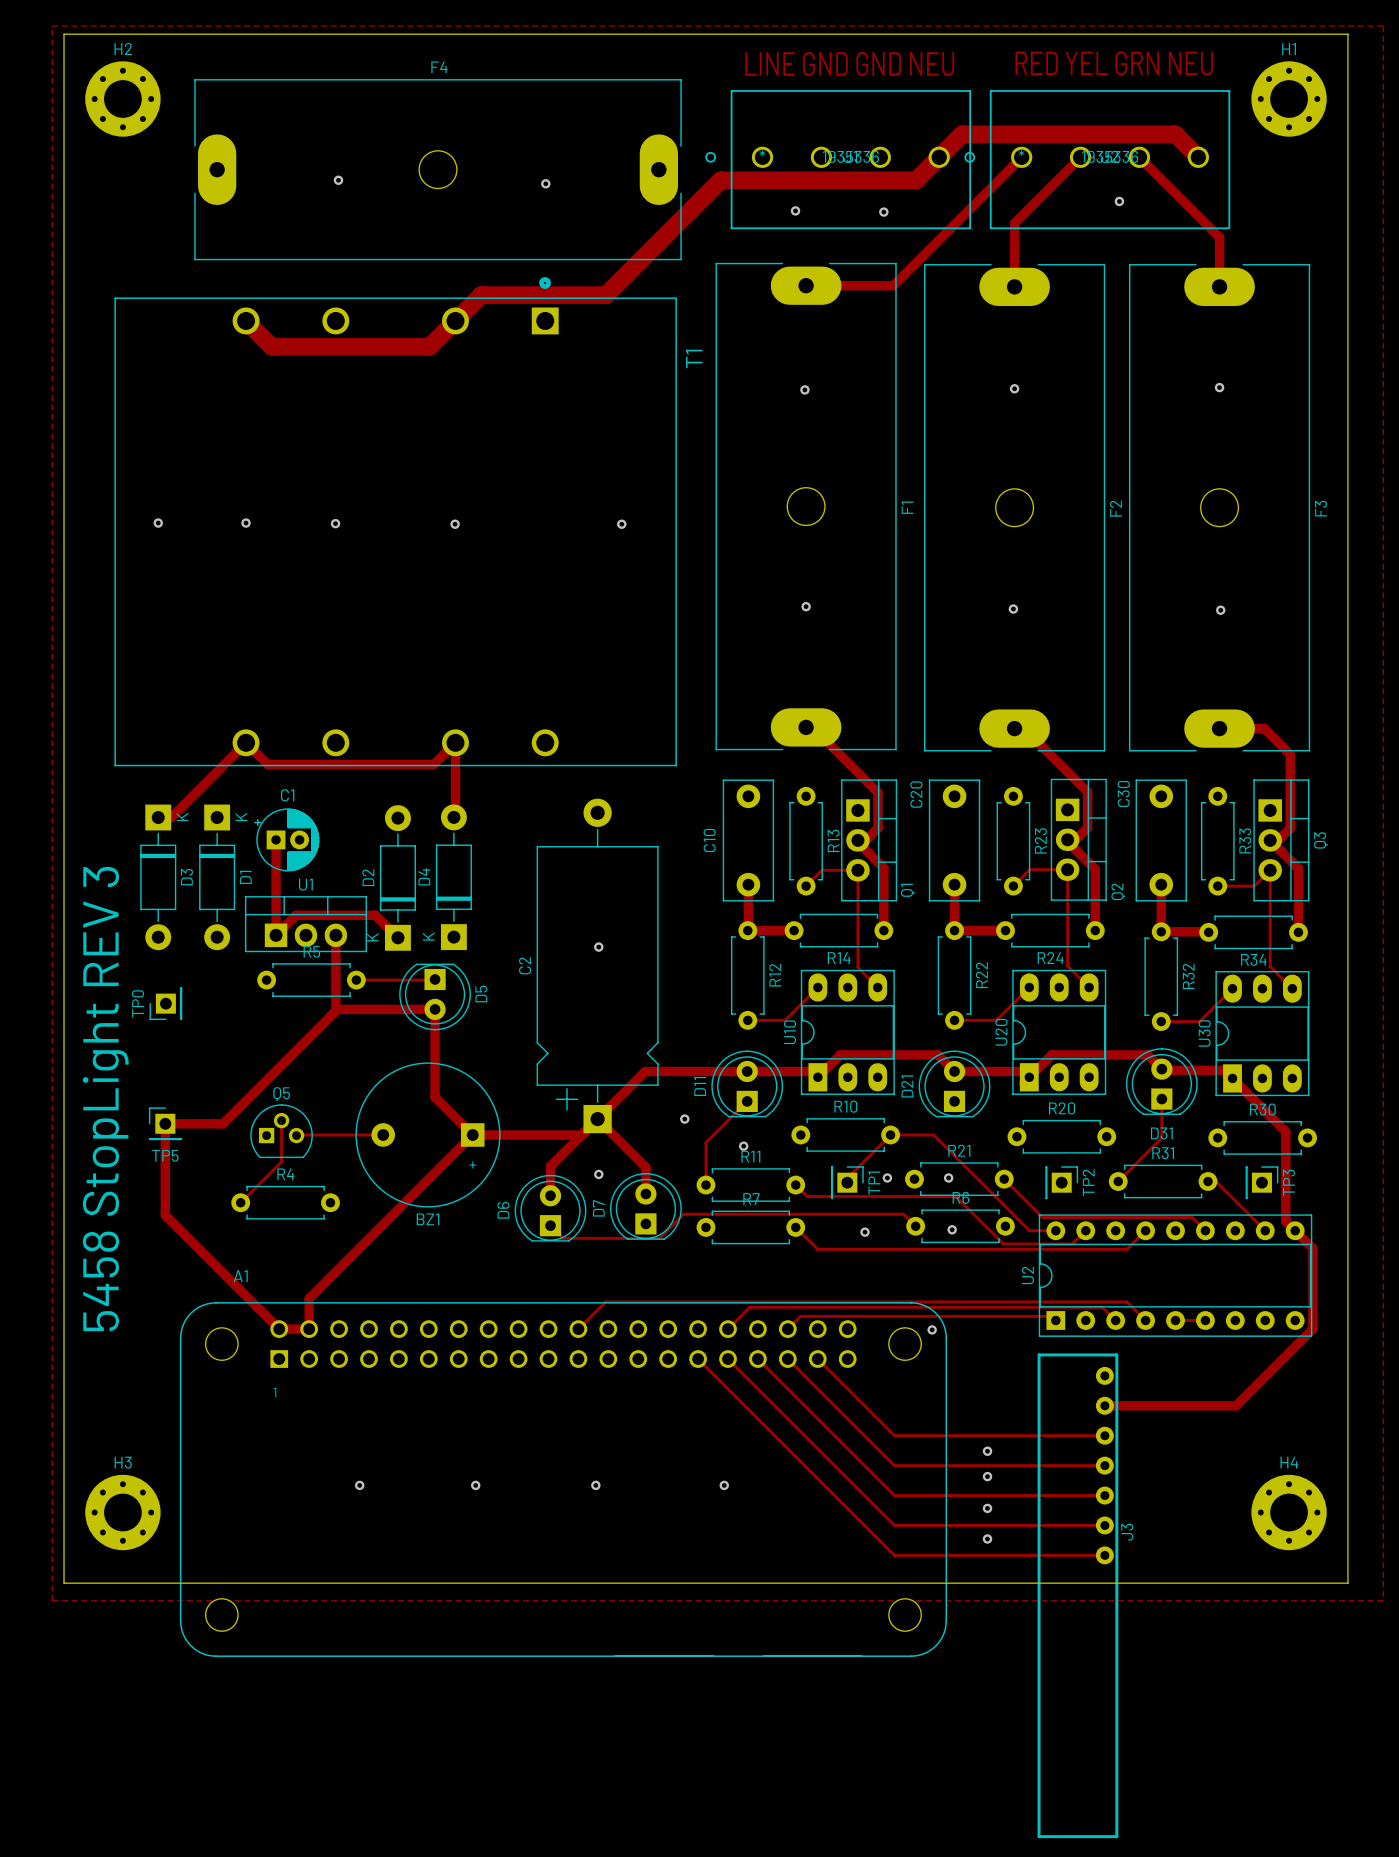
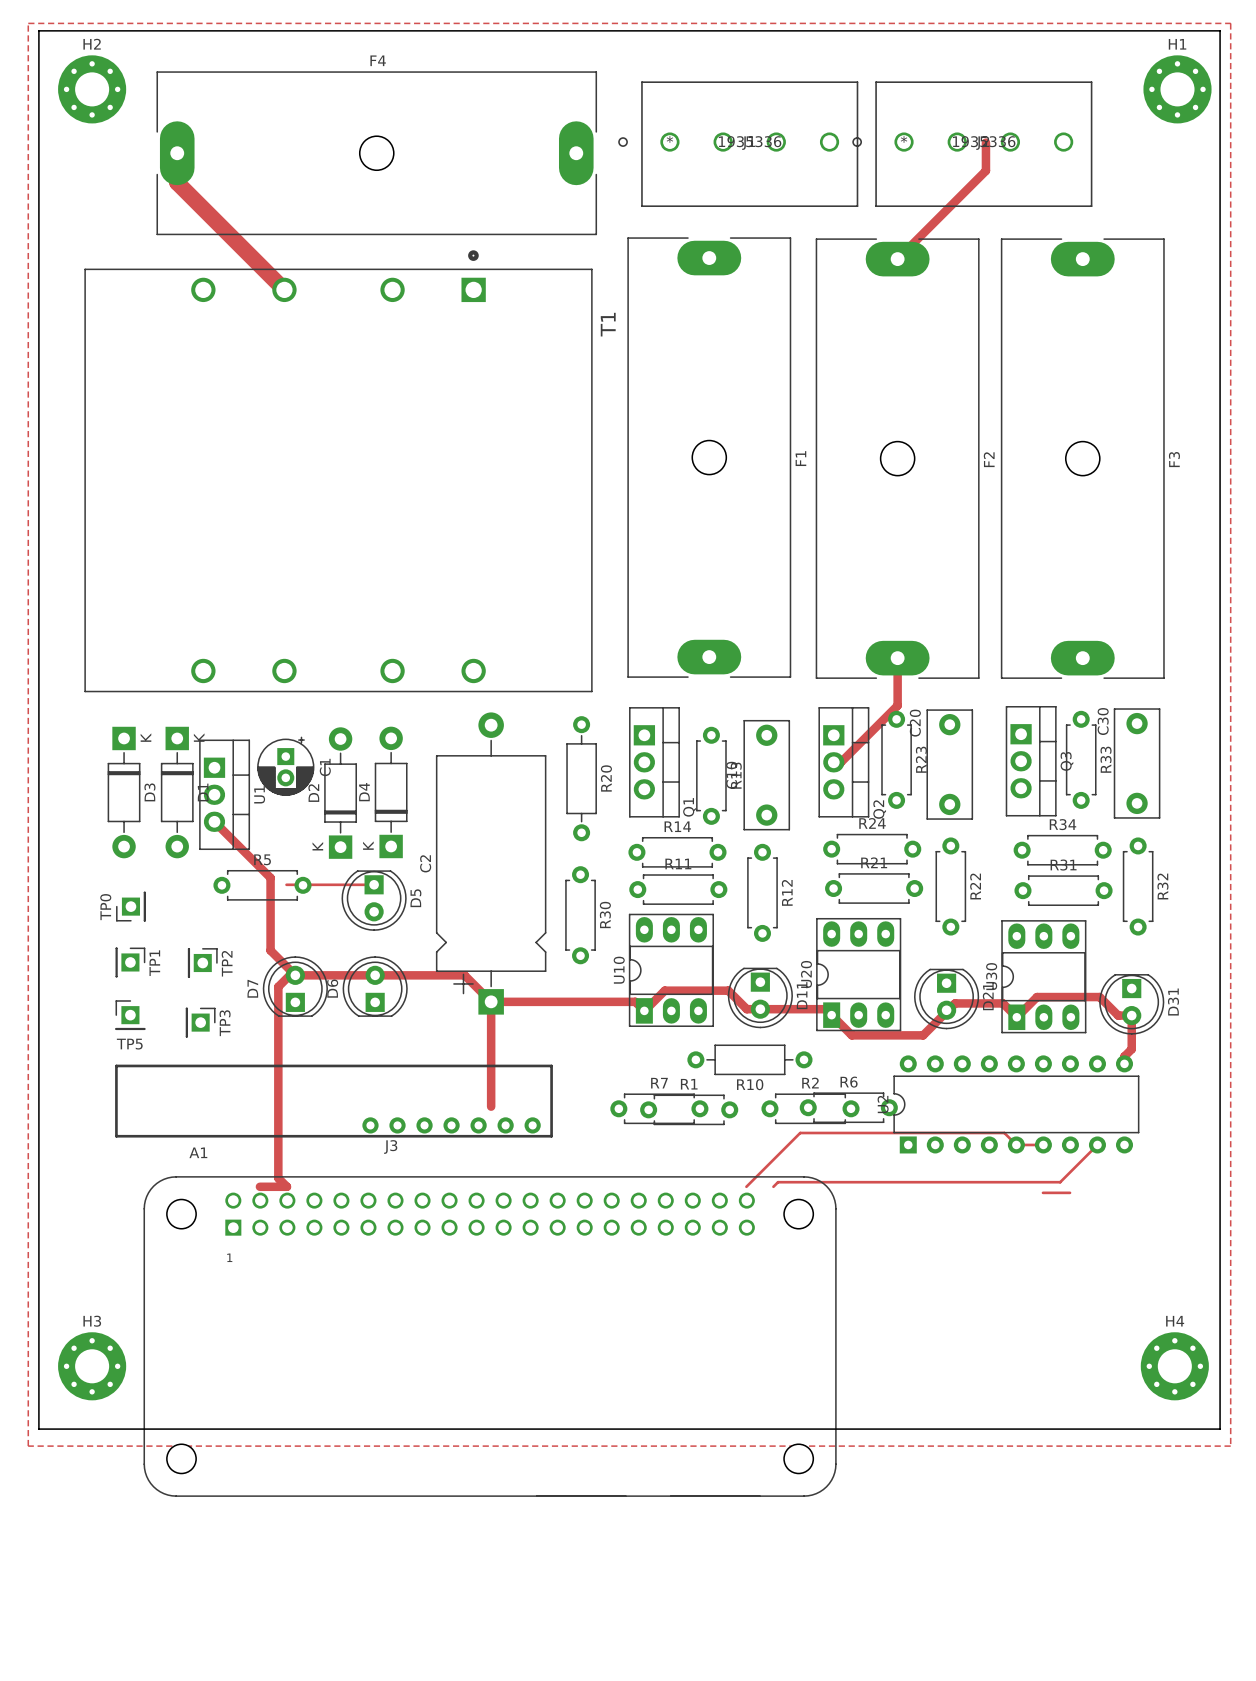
board edge: (1347, 34) (1347, 1583) (64, 1582) -> (1198, 30) (1220, 30) (1220, 1429) (38, 1429)
text: LINE GND GND NEU (849, 63) -> none
text: RED YEL GRN NEU (1114, 63) -> none
H1 position: (1289, 98) -> (1177, 89)
track: (1021, 157) (893, 285) (806, 285) -> none
track: (1080, 157) (1014, 223) (1014, 286) -> (985, 142) (985, 170) (897, 259)
track: (1139, 157) (1219, 237) (1219, 286) -> none
track: (1198, 157) (1175, 134) (962, 134) (916, 180) (720, 180) (605, 295) (481, 295) (429, 346) (271, 346) (246, 320) -> none
via: (338, 180) -> none
track: none -> (177, 163) (177, 182) (284, 289)
via: (545, 183) -> none
via: (1119, 201) -> none
via: (795, 210) -> none
via: (883, 212) -> none
via: (1219, 387) -> none
via: (1014, 388) -> none
via: (804, 389) -> none
via: (158, 523) -> none
via: (246, 523) -> none
via: (335, 523) -> none
via: (455, 524) -> none
via: (621, 524) -> none
via: (806, 606) -> none
via: (1013, 609) -> none
via: (1220, 610) -> none
track: (806, 727) (812, 727) (877, 792) (877, 828) (865, 840) (857, 840) (857, 842) (883, 868) (883, 930) -> none
track: (1014, 728) (1024, 728) (1087, 792) (1087, 827) (1075, 839) (1067, 839) (1067, 841) (1095, 869) (1095, 930) -> (897, 658) (897, 705) (840, 762) (833, 762)
track: (1219, 728) (1264, 728) (1290, 754) (1290, 828) (1278, 840) (1270, 840) (1298, 868) (1298, 932) -> none
track: (453, 817) (455, 815) (455, 742) (433, 764) (267, 764) (246, 742) (171, 817) (158, 817) -> none
track: (276, 839) (276, 935) (296, 915) (375, 915) (397, 937) -> none
C1 rotation: 0° (286, 839) -> 90° clockwise (285, 766)
C1 position: (286, 839) -> (285, 766)
Q2 position: (1078, 839) -> (843, 762)
C10 position: (748, 840) -> (766, 775)
Q1 position: (869, 840) -> (654, 762)
C20 position: (954, 840) -> (949, 764)
C30 position: (1161, 840) -> (1137, 763)
Q3 position: (1281, 840) -> (1031, 761)
R13 position: (806, 841) -> (711, 775)
track: (748, 884) (747, 930) (794, 930) -> none
track: (954, 884) (954, 930) (1005, 930) -> none
track: (1161, 884) (1161, 931) (1208, 932) -> none
track: (806, 886) (821, 870) (857, 870) (857, 967) (877, 987) -> none
track: (1013, 886) (1029, 869) (1067, 869) (1067, 965) (1089, 987) -> none
track: (1217, 886) (1254, 886) (1270, 870) (1270, 966) (1292, 988) -> none
track: none -> (214, 821) (270, 877) (270, 950) (295, 975)
U1 rotation: 0° (305, 924) -> 90° clockwise (224, 794)
R14 position: (838, 930) -> (677, 852)
R24 position: (1050, 930) -> (872, 849)
R34 position: (1253, 932) -> (1062, 850)
track: (335, 935) (335, 1010) -> none
via: (598, 947) -> none
R14 name position: R14 (839, 958) -> R14 (677, 826)
R24 name position: R24 (1050, 958) -> R24 (872, 823)
R34 name position: R34 (1253, 959) -> R34 (1062, 824)
C2 position: (597, 965) -> (491, 863)
R12 position: (747, 975) -> (762, 892)
R22 position: (954, 975) -> (950, 886)
R32 position: (1161, 976) -> (1138, 886)
track: (435, 979) (356, 980) -> (374, 884) (286, 884)
track: (817, 987) (785, 1020) (747, 1020) -> none
track: (1029, 987) (996, 1020) (954, 1020) -> none
track: (1232, 988) (1199, 1021) (1161, 1021) -> none
U10 position: (847, 1032) -> (671, 970)
U20 position: (1059, 1032) -> (858, 974)
U30 position: (1262, 1033) -> (1043, 976)
track: (1161, 1069) (1147, 1054) (1051, 1054) (1023, 1083) -> none
track: (1163, 1070) (1224, 1070) (1285, 1131) (1285, 1221) (1312, 1248) (1312, 1328) (1236, 1405) (1104, 1405) -> none
track: (1029, 1077) (1023, 1071) (954, 1071) (937, 1054) (840, 1054) (817, 1077) (812, 1071) (645, 1071) (550, 1166) (550, 1195) -> none
D31 rotation: 0° (1161, 1081) -> 180° (1131, 1004)
D31 position: (1161, 1081) -> (1131, 1004)
D11 rotation: 0° (747, 1083) -> 180° (760, 997)
D11 position: (747, 1083) -> (760, 997)
D21 rotation: 0° (954, 1083) -> 180° (946, 999)
D21 position: (954, 1083) -> (946, 999)
text: 5458 StopLight REV 3 (105, 1099) -> none
track: (1161, 1099) (1161, 1137) (1118, 1181) -> none
track: (747, 1101) (705, 1142) (705, 1185) -> none
R10 name position: R10 (845, 1106) -> R10 (750, 1084)
R20 name position: R20 (1062, 1108) -> R20 (606, 778)
track: none -> (491, 1001) (464, 975) (289, 975) (278, 986) (278, 1178) (286, 1186) (259, 1186)
track: none -> (491, 1001) (491, 1106)
track: none -> (491, 1001) (635, 1001) (644, 1010)
R10 footprint: [791, 1118, 900, 1152] -> [687, 1044, 813, 1076]
track: (597, 1119) (645, 1167) (645, 1193) -> none
via: (684, 1119) -> none
track: none -> (644, 1010) (664, 990) (728, 990) (746, 1009) (825, 1009) (851, 1035) (923, 1035) (955, 1003) (1002, 1003) (1016, 1017) (1037, 997) (1099, 997) (1118, 1015) (1131, 1015) (1131, 1049) (1124, 1056) (1124, 1063)
R20 footprint: [1007, 1119, 1117, 1154] -> [566, 716, 597, 842]
track: (281, 1120) (281, 1161) (240, 1202) -> none
Q5: (281, 1131) -> none
D31 name position: D31 (1161, 1133) -> D31 (1173, 1002)
track: (383, 1134) (294, 1134) (291, 1137) -> none
BZ1: (428, 1134) -> none
track: (472, 1134) (435, 1097) (435, 1009) (337, 1009) (223, 1123) (165, 1123) (165, 1215) (279, 1329) (309, 1329) (309, 1298) (472, 1134) -> none
track: (472, 1134) (581, 1134) -> none
R30 rotation: 0° (1262, 1137) -> 90° clockwise (580, 915)
R30 position: (1262, 1137) -> (580, 915)
via: (743, 1146) -> none
via: (598, 1174) -> none
via: (887, 1177) -> none
via: (948, 1177) -> none
R21 position: (959, 1179) -> (874, 888)
track: (1004, 1179) (1042, 1217) (1192, 1217) (1205, 1230) -> none
R31 position: (1163, 1181) -> (1063, 890)
track: (1208, 1181) (1216, 1181) (1265, 1230) -> none
track: (847, 1182) (847, 1178) (890, 1134) (933, 1134) (1029, 1230) (1055, 1230) -> none
TP1 position: (847, 1182) -> (130, 962)
TP2 position: (1061, 1182) -> (202, 963)
TP3 position: (1261, 1182) -> (200, 1022)
R11 position: (750, 1185) -> (678, 889)
track: (795, 1185) (807, 1196) (956, 1196) (1003, 1243) (1072, 1243) (1085, 1230) -> none
R4: (285, 1202) -> none
D7 position: (645, 1206) -> (295, 986)
D6 position: (550, 1208) -> (375, 986)
U2 footprint: [1038, 1214, 1313, 1337] -> [893, 1055, 1140, 1154]
track: (550, 1225) (563, 1238) (659, 1238) (683, 1214) (903, 1214) (915, 1226) -> none
track: (795, 1227) (817, 1249) (1127, 1249) (1145, 1230) -> none
R2: none -> (810, 1108)
R1: none -> (689, 1109)
via: (952, 1229) -> none
via: (865, 1232) -> none
track: none -> (1043, 1144) (1016, 1144) (1004, 1132) (800, 1132) (746, 1186)
track: none -> (1097, 1144) (1060, 1182) (778, 1182) (773, 1186)
track: (1055, 1320) (1051, 1316) (800, 1316) (787, 1329) -> none
track: (1115, 1320) (1102, 1307) (749, 1307) (728, 1329) -> none
track: (1145, 1320) (1127, 1301) (605, 1301) (578, 1329) -> none
via: (932, 1329) -> none
track: (698, 1359) (894, 1555) (1104, 1555) -> none
track: (728, 1359) (894, 1525) (1104, 1525) -> none
track: (757, 1359) (894, 1495) (1104, 1495) -> none
track: (787, 1359) (894, 1465) (1104, 1465) -> none
track: (817, 1359) (894, 1435) (1104, 1435) -> none
via: (987, 1451) -> none
via: (987, 1476) -> none
via: (359, 1485) -> none
via: (475, 1485) -> none
via: (595, 1485) -> none
via: (724, 1485) -> none
via: (987, 1508) -> none
H4 position: (1289, 1512) -> (1174, 1366)
via: (987, 1539) -> none
J3 rotation: 0° (1077, 1595) -> 90° clockwise (334, 1101)
J3 position: (1077, 1595) -> (334, 1101)

